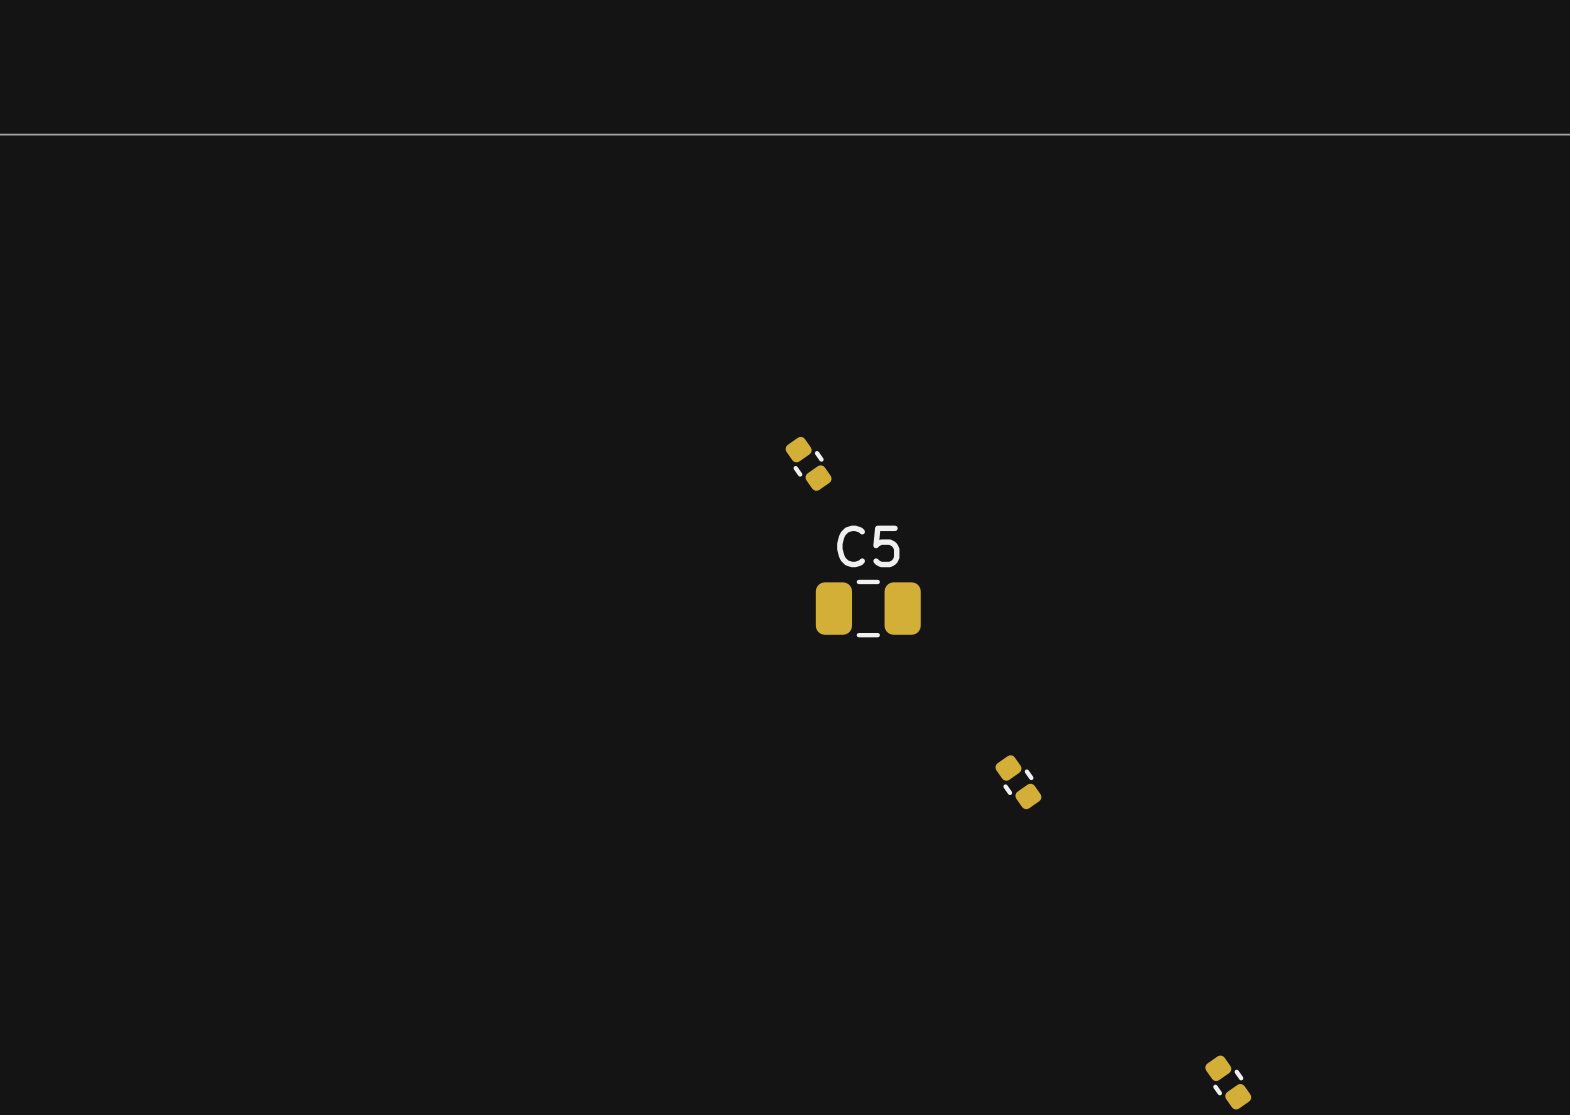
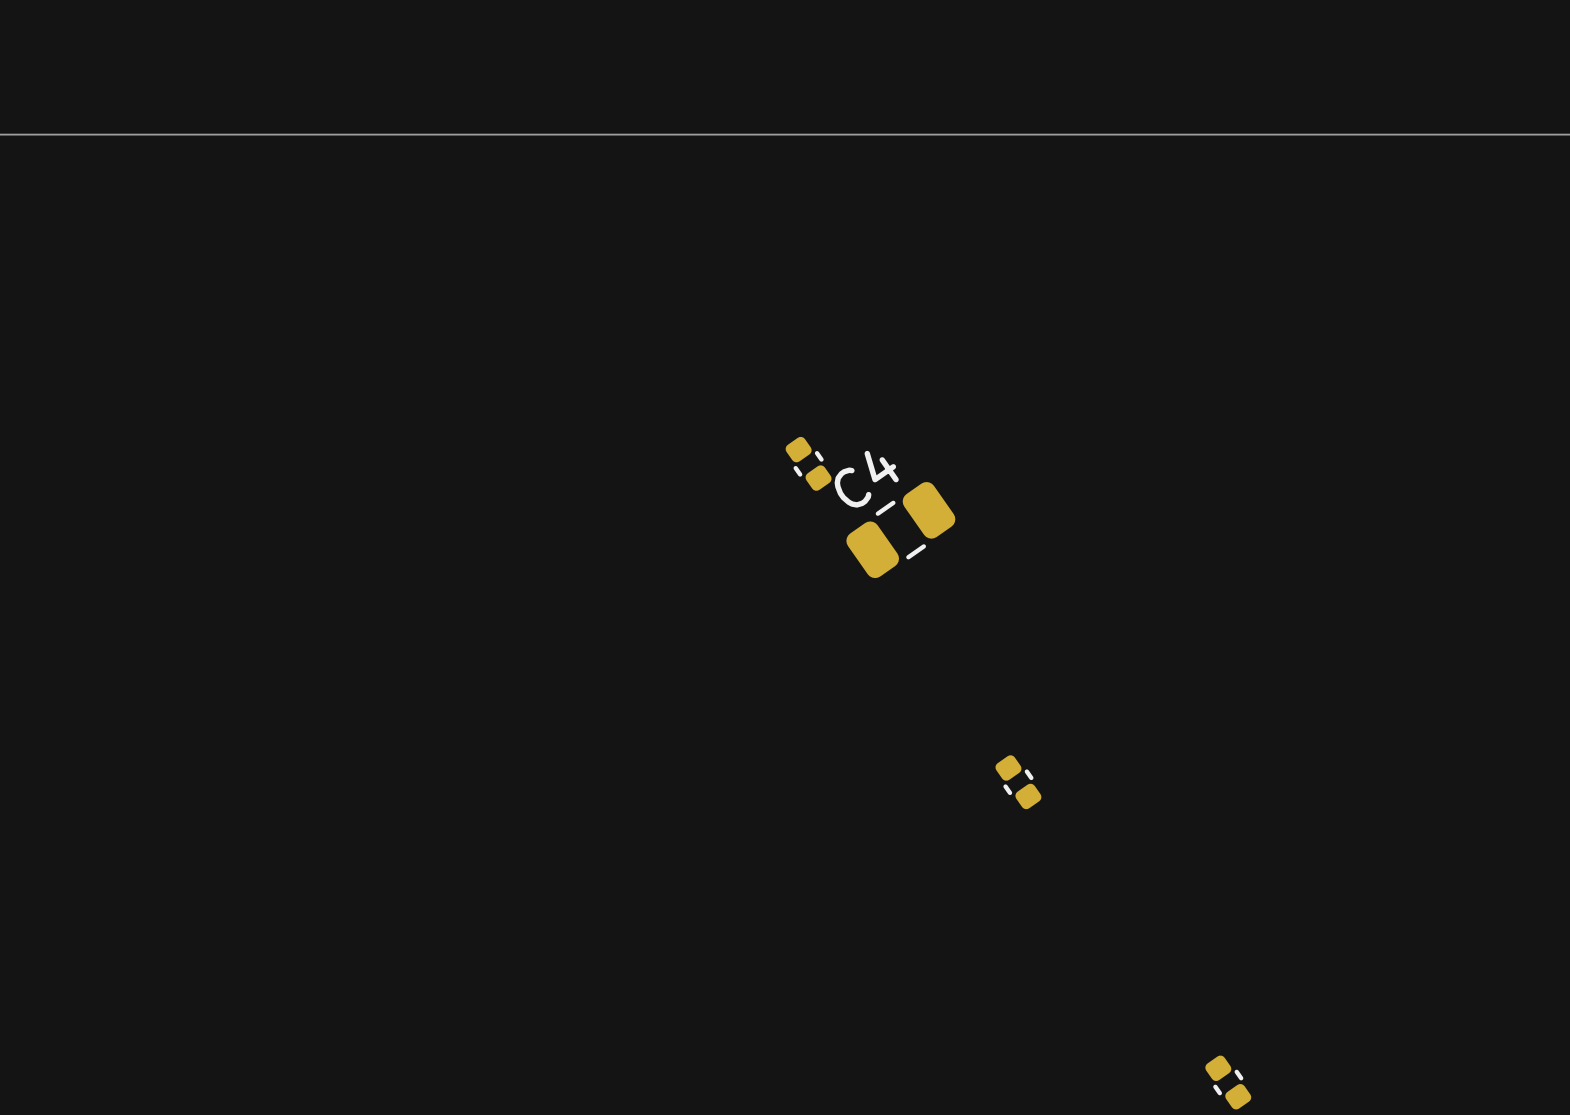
C4: none -> (900, 530)
C5: (868, 608) -> none

